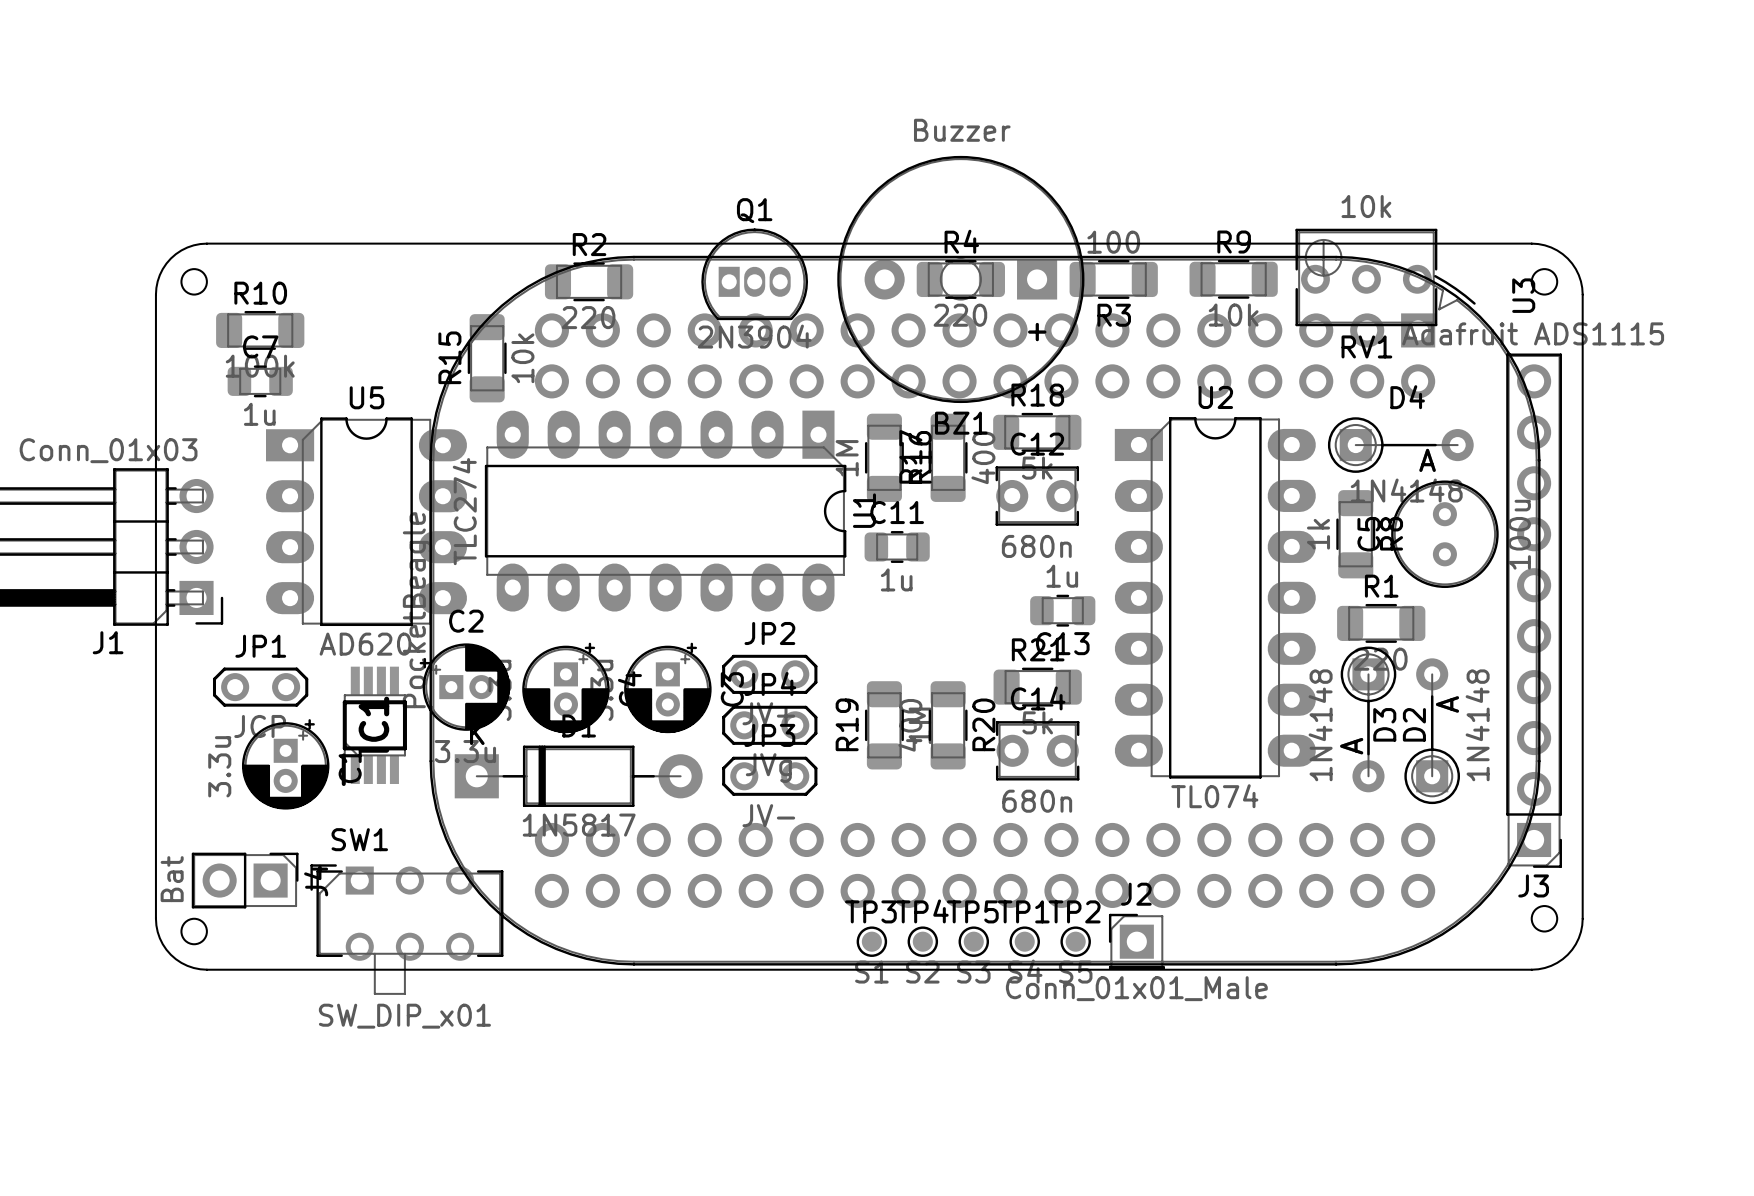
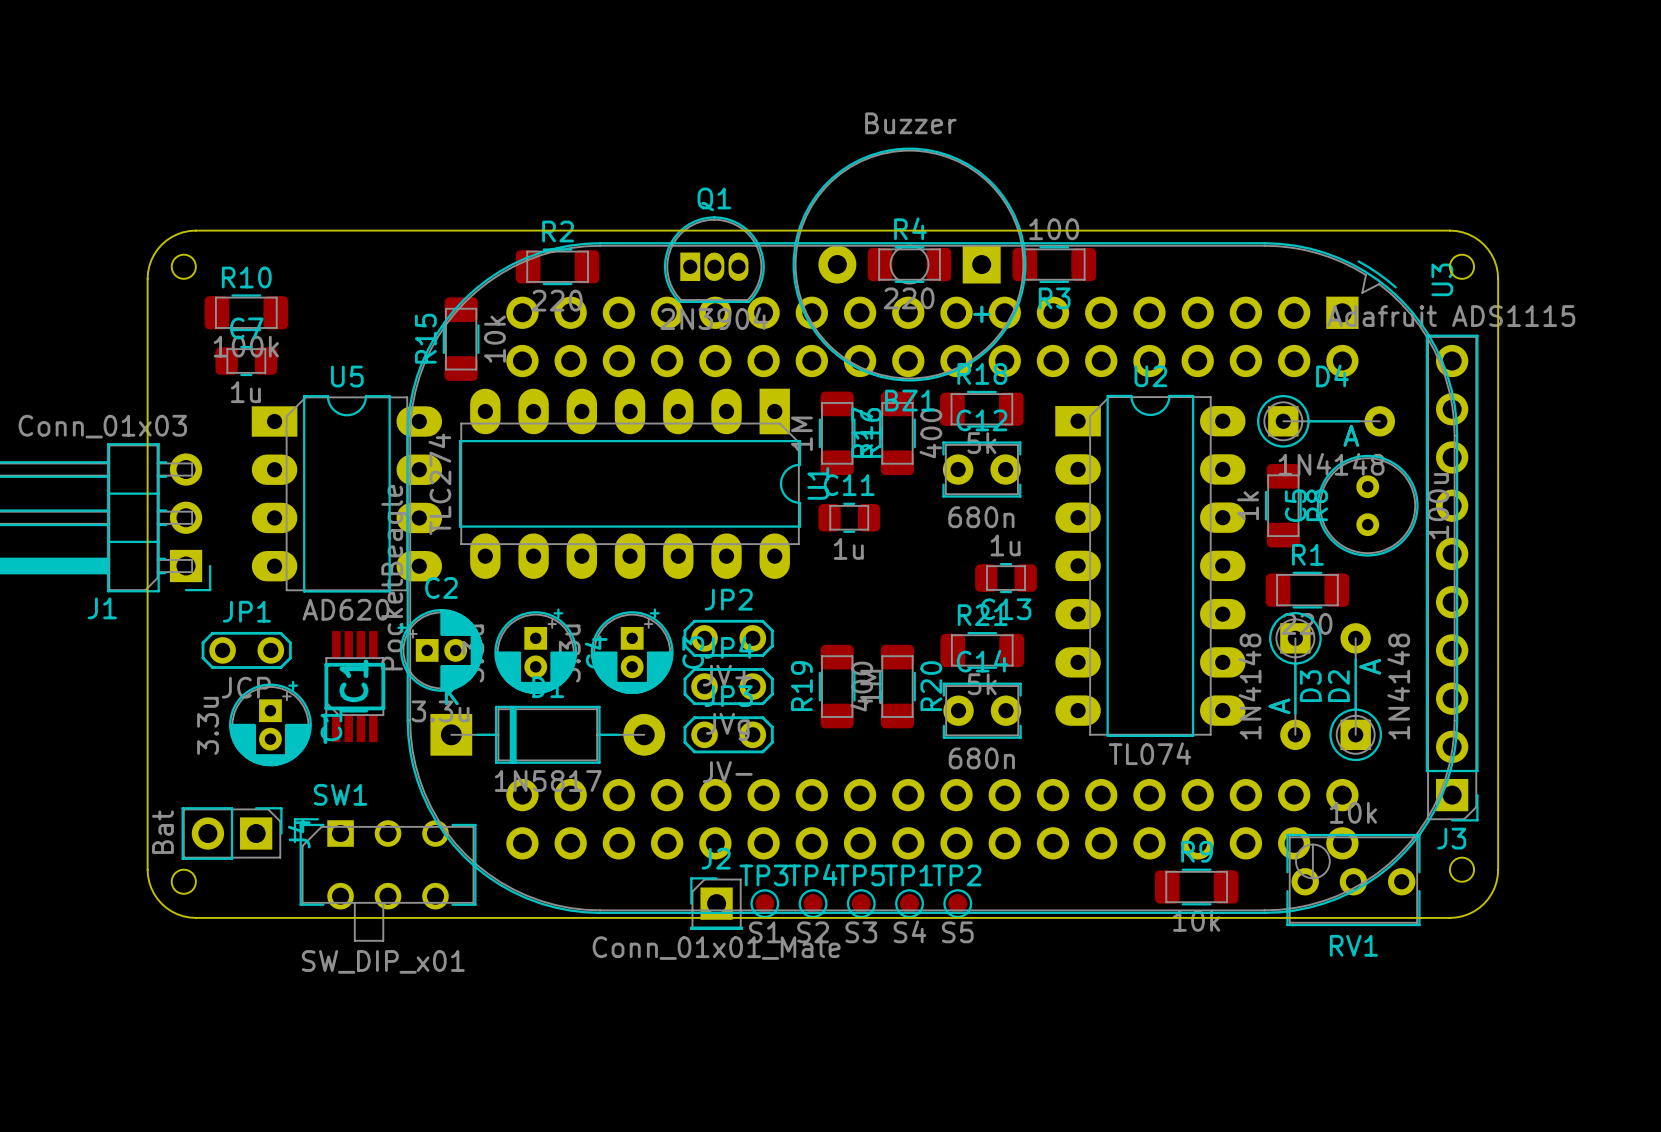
RV1 footprint: [1295, 228, 1438, 327] -> [1286, 833, 1421, 927]
R9 position: (1233, 279) -> (1196, 887)
TP3 position: (871, 941) -> (764, 903)
TP4 position: (922, 941) -> (813, 903)
TP5 position: (973, 941) -> (861, 903)
TP1 position: (1024, 941) -> (909, 903)
TP2 position: (1075, 941) -> (957, 903)
J2 position: (1136, 941) -> (716, 903)

